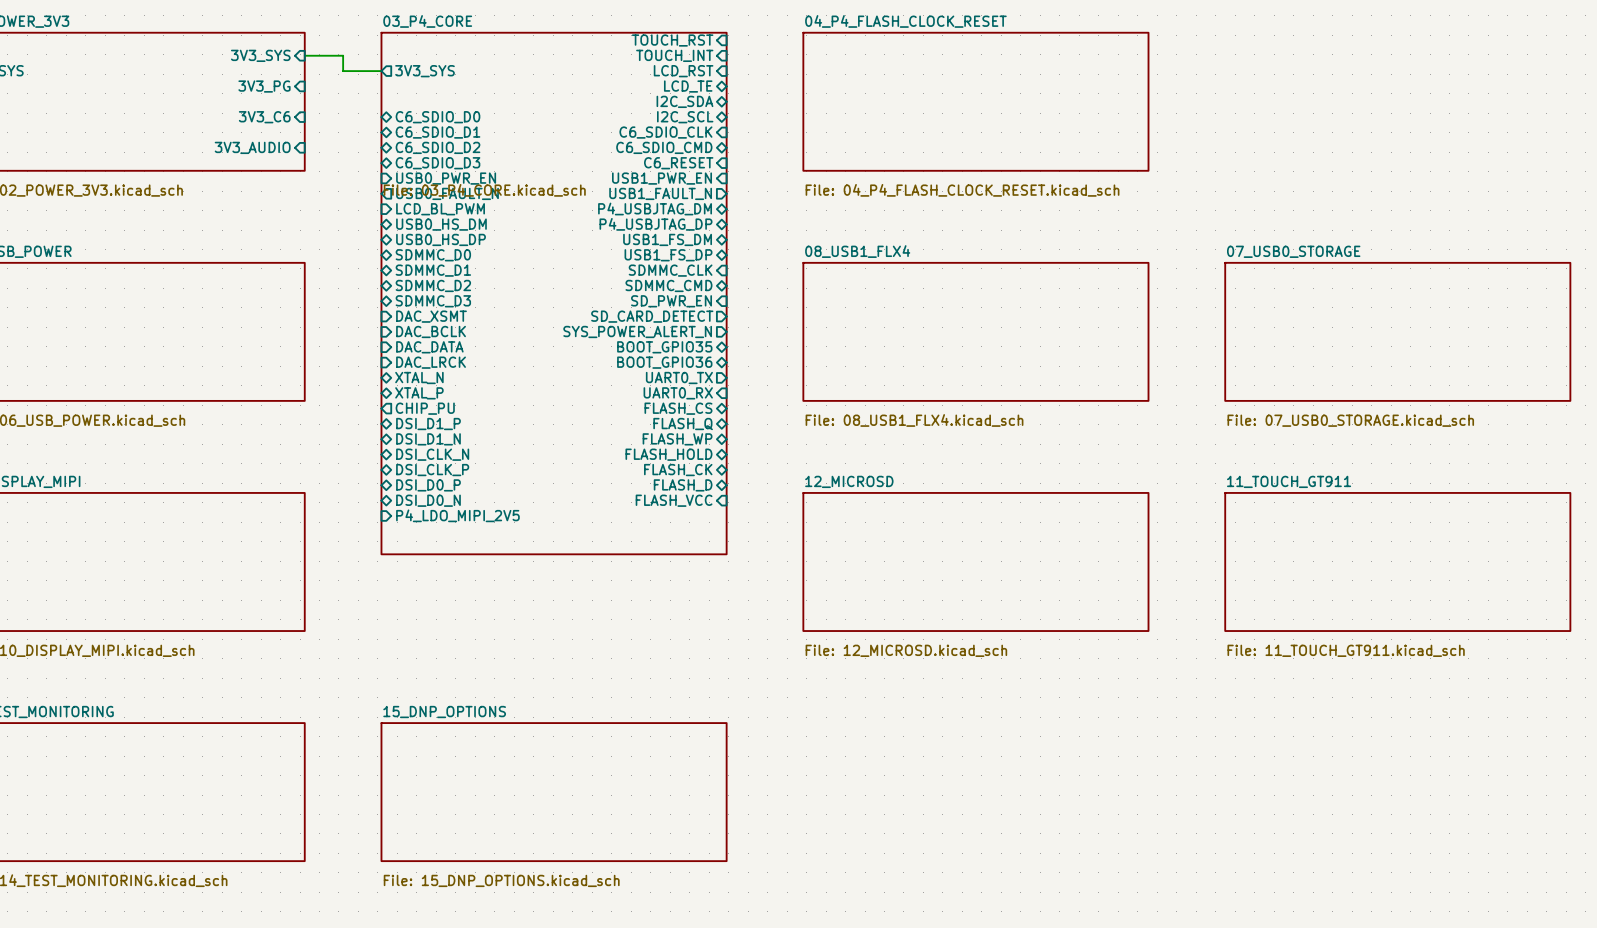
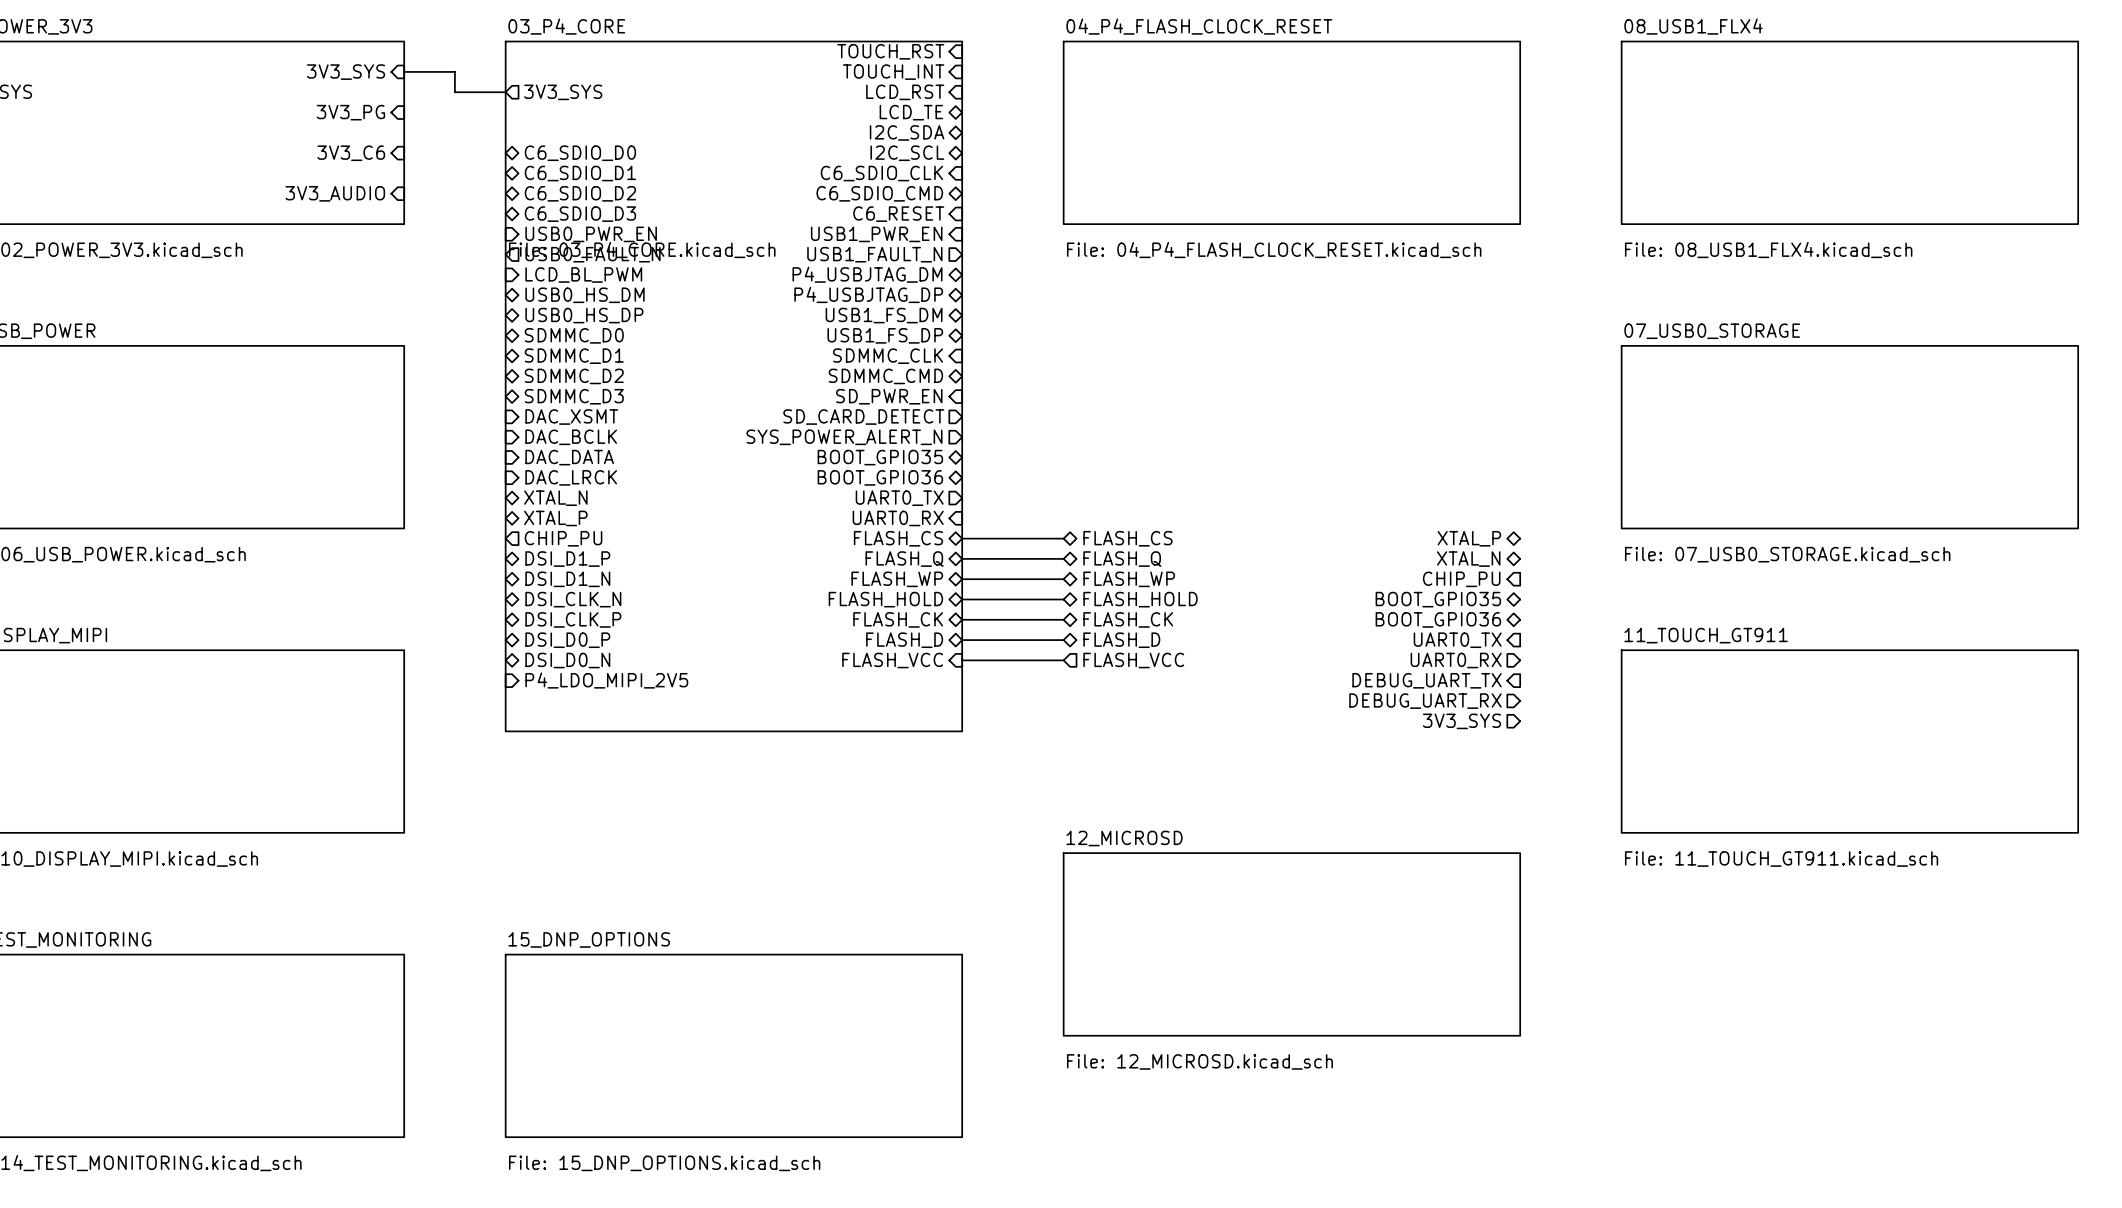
sheet 08_USB1_FLX4 position: (975, 331) -> (1849, 132)
wire: none -> (962, 538) (1063, 538)
sheet pin: none -> FLASH_CS (1127, 538)
sheet pin: none -> XTAL_P (1469, 538)
wire: none -> (962, 558) (1063, 558)
sheet pin: none -> FLASH_Q (1122, 559)
sheet pin: none -> XTAL_N (1468, 559)
wire: none -> (962, 579) (1063, 579)
sheet pin: none -> FLASH_WP (1129, 579)
sheet pin: none -> CHIP_PU (1461, 579)
wire: none -> (962, 599) (1063, 599)
sheet pin: none -> FLASH_HOLD (1140, 599)
sheet pin: none -> BOOT_GPIO35 (1438, 599)
wire: none -> (962, 619) (1063, 619)
sheet pin: none -> FLASH_CK (1128, 619)
sheet pin: none -> BOOT_GPIO36 (1438, 619)
wire: none -> (962, 640) (1063, 640)
sheet pin: none -> FLASH_D (1121, 640)
sheet pin: none -> UART0_TX (1457, 640)
wire: none -> (962, 660) (1063, 660)
sheet pin: none -> FLASH_VCC (1133, 660)
sheet pin: none -> UART0_RX (1456, 660)
sheet pin: none -> DEBUG_UART_TX (1427, 680)
sheet pin: none -> DEBUG_UART_RX (1425, 701)
sheet pin: none -> 3V3_SYS (1462, 721)
sheet 12_MICROSD position: (975, 561) -> (1291, 944)

